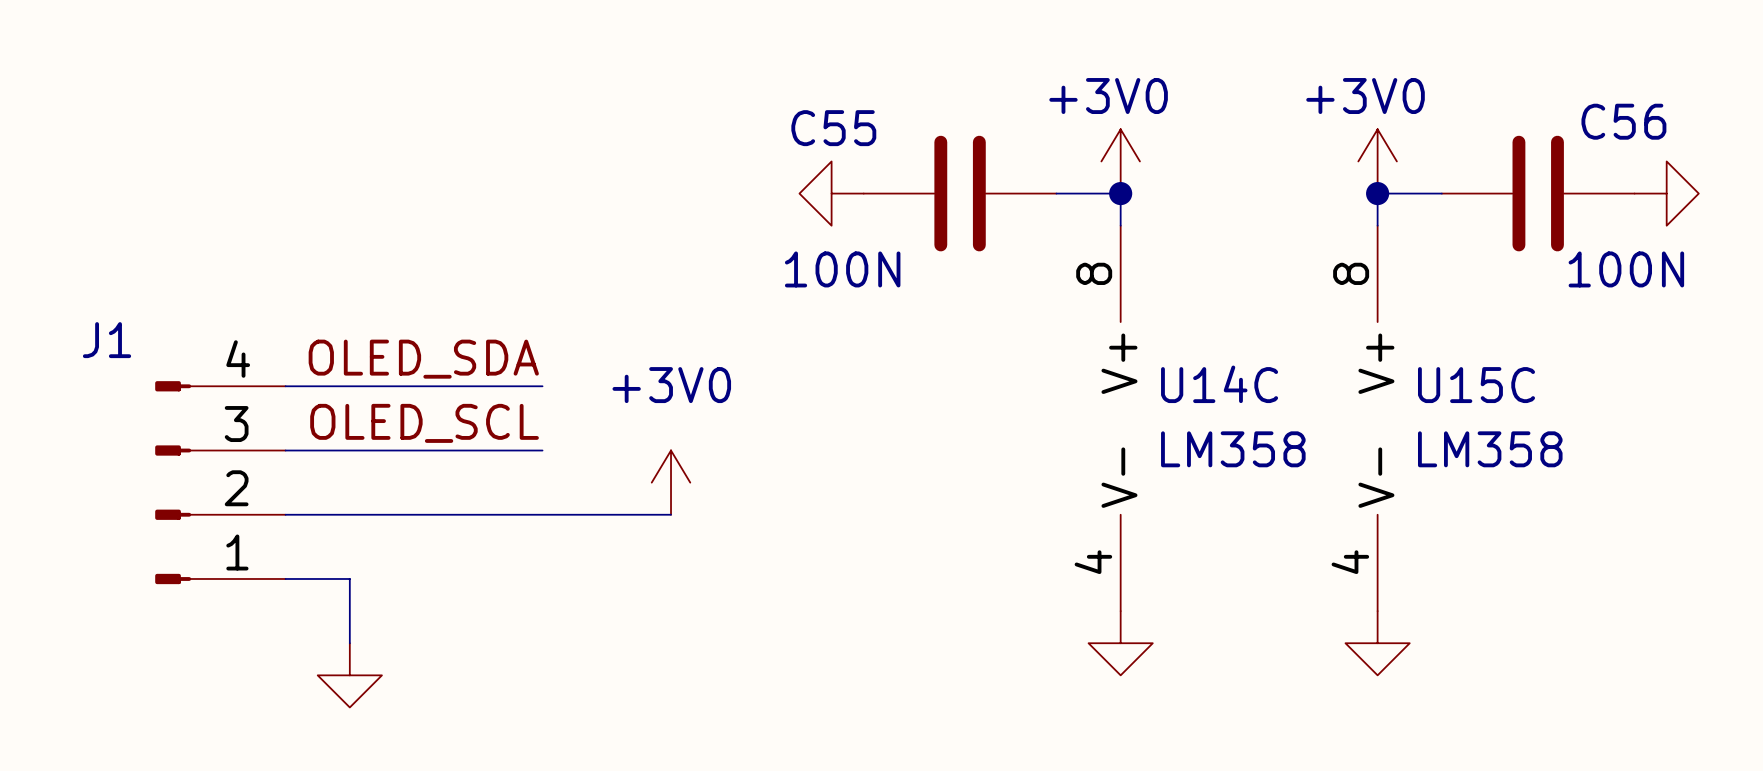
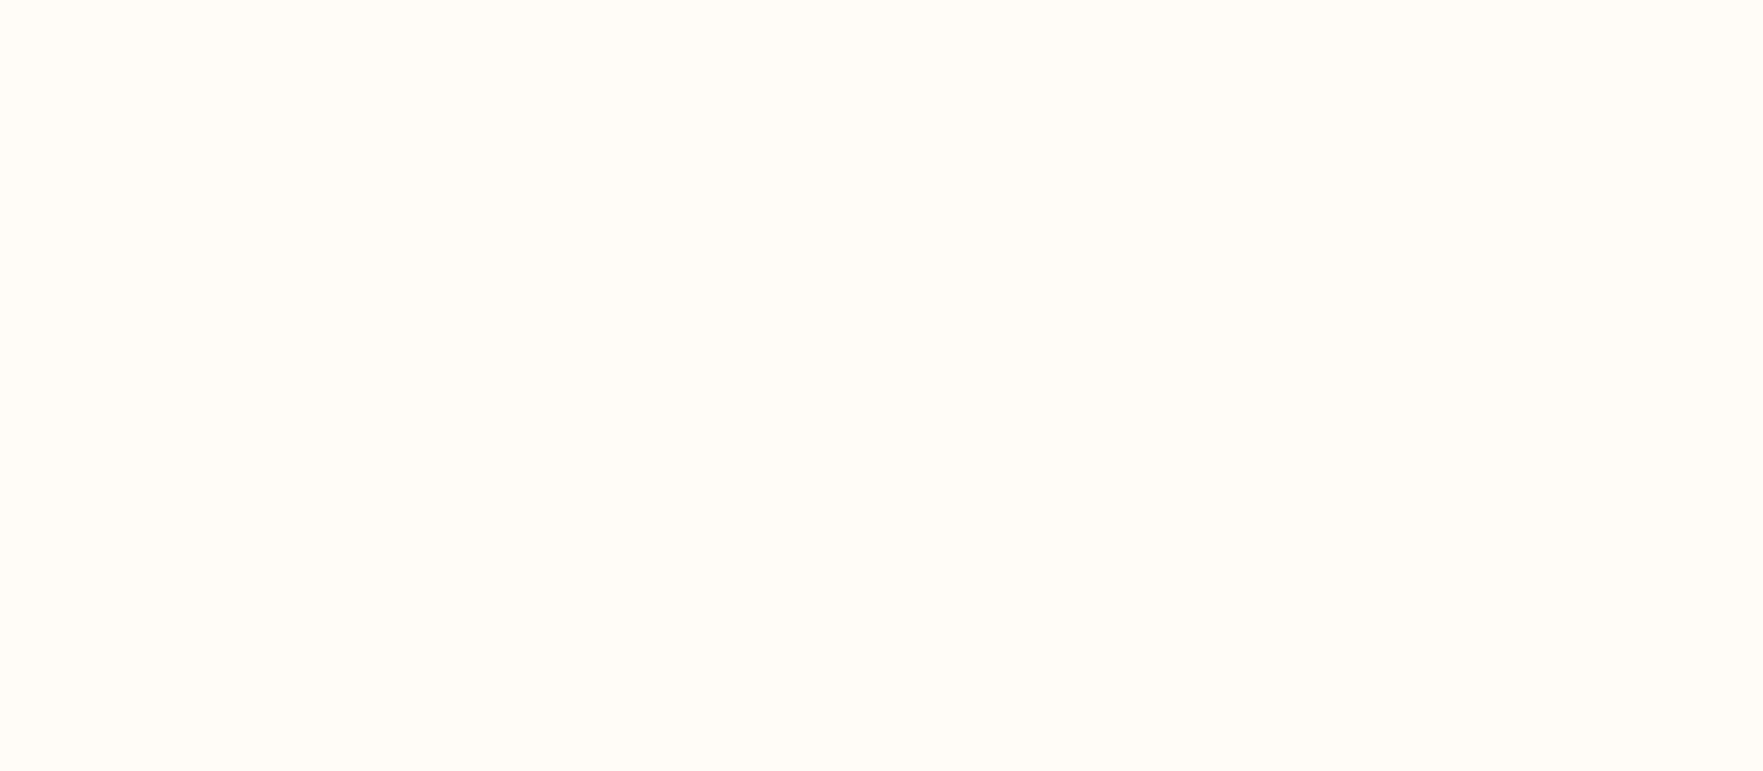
power symbol: +3V0 (1120, 161) -> none
power symbol: +3V0 (1377, 161) -> none
power symbol: (831, 193) -> none
C55: 100N (960, 193) -> none
wire: (1056, 193) (1120, 193) (1120, 225) -> none
junction: (1120, 193) -> none
junction: (1377, 193) -> none
wire: (1441, 193) (1377, 193) (1377, 225) -> none
C56: 100N (1538, 193) -> none
power symbol: (1666, 193) -> none
label: OLED_SDA (423, 359) -> none
wire: (285, 386) (542, 386) -> none
U14C: LM358 (1120, 418) -> none
U15C: LM358 (1377, 418) -> none
label: OLED_SCL (424, 423) -> none
wire: (285, 450) (542, 450) -> none
J1: (220, 482) -> none
power symbol: +3V0 (671, 482) -> none
wire: (285, 514) (671, 514) -> none
wire: (285, 578) (349, 578) (349, 643) -> none
power symbol: (1120, 643) -> none
power symbol: (1377, 643) -> none
power symbol: (349, 675) -> none

